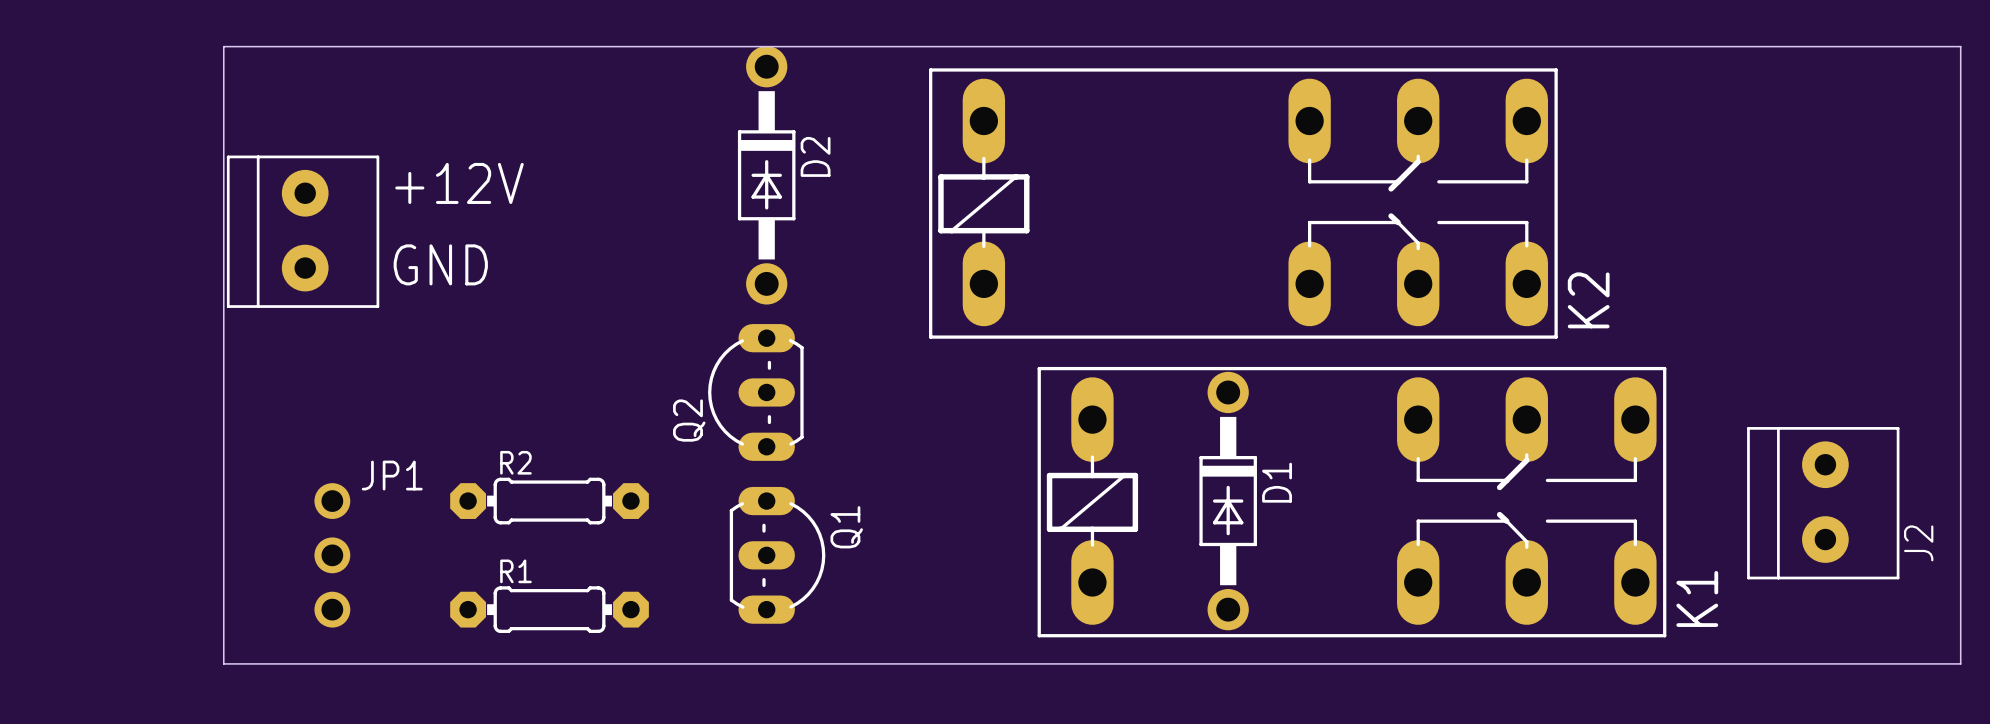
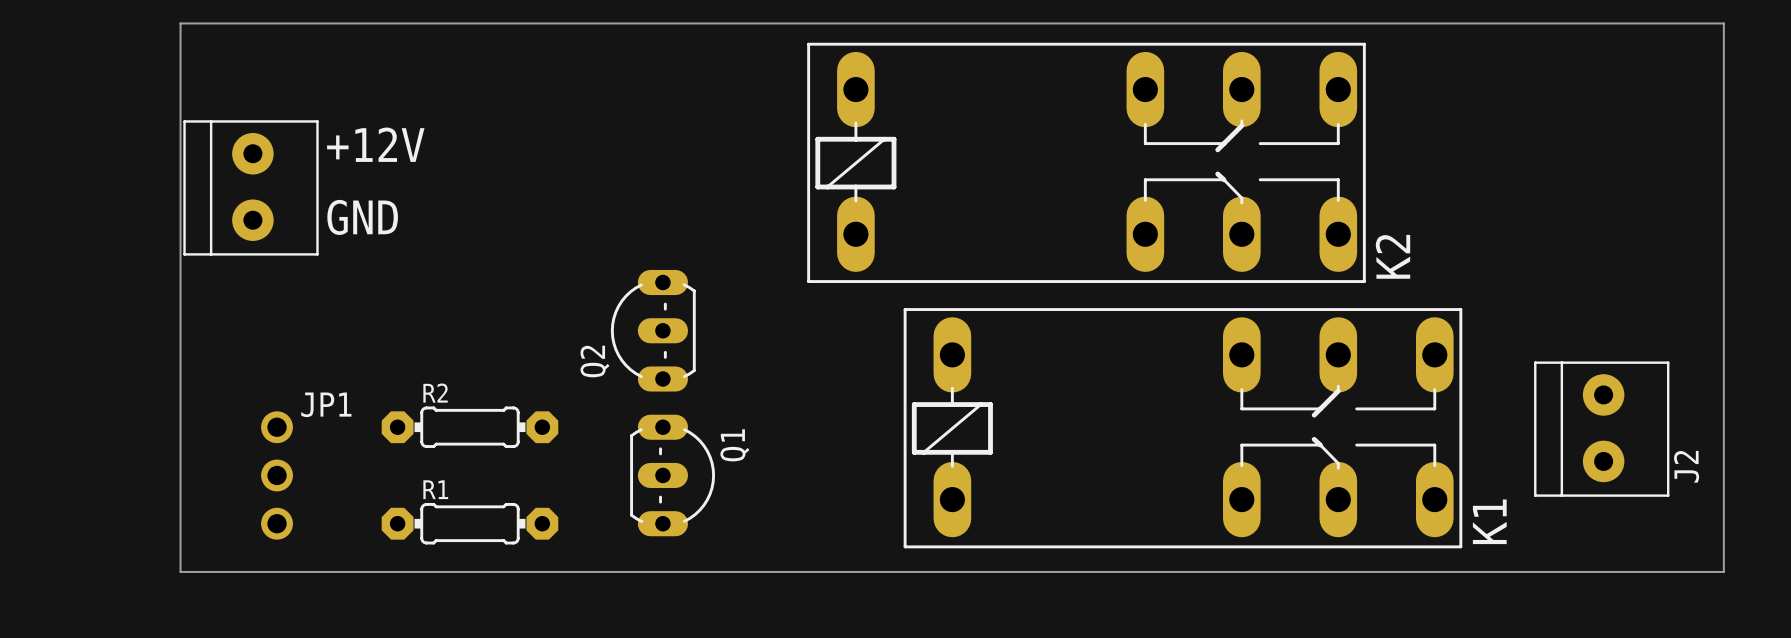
D2: (766, 175) -> none
D1: (1228, 501) -> none

